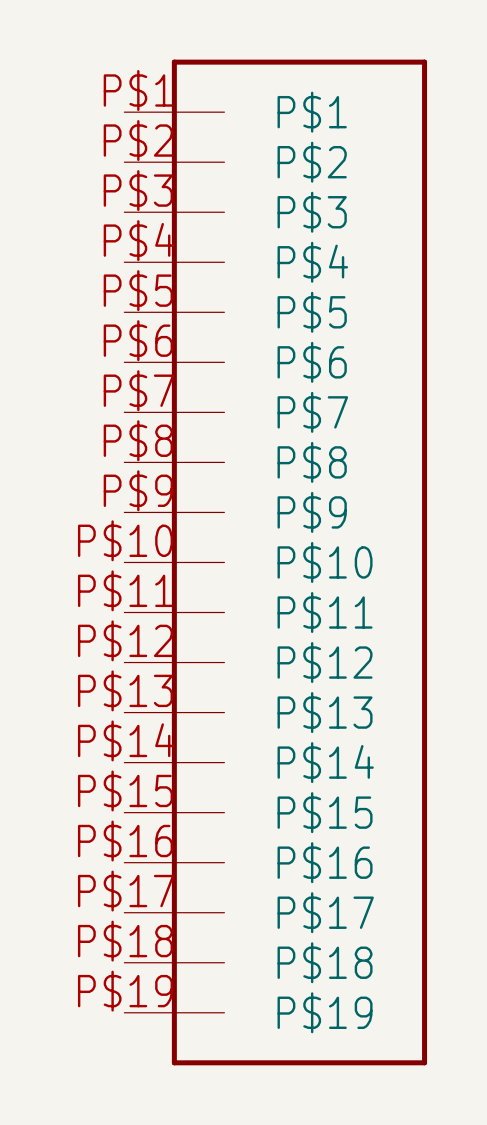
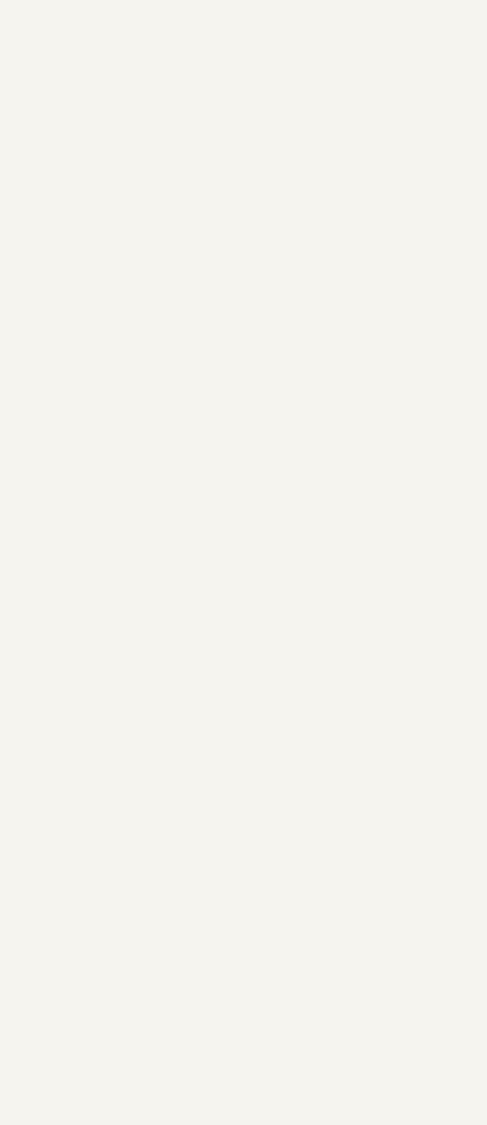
part: (275, 562) -> none

